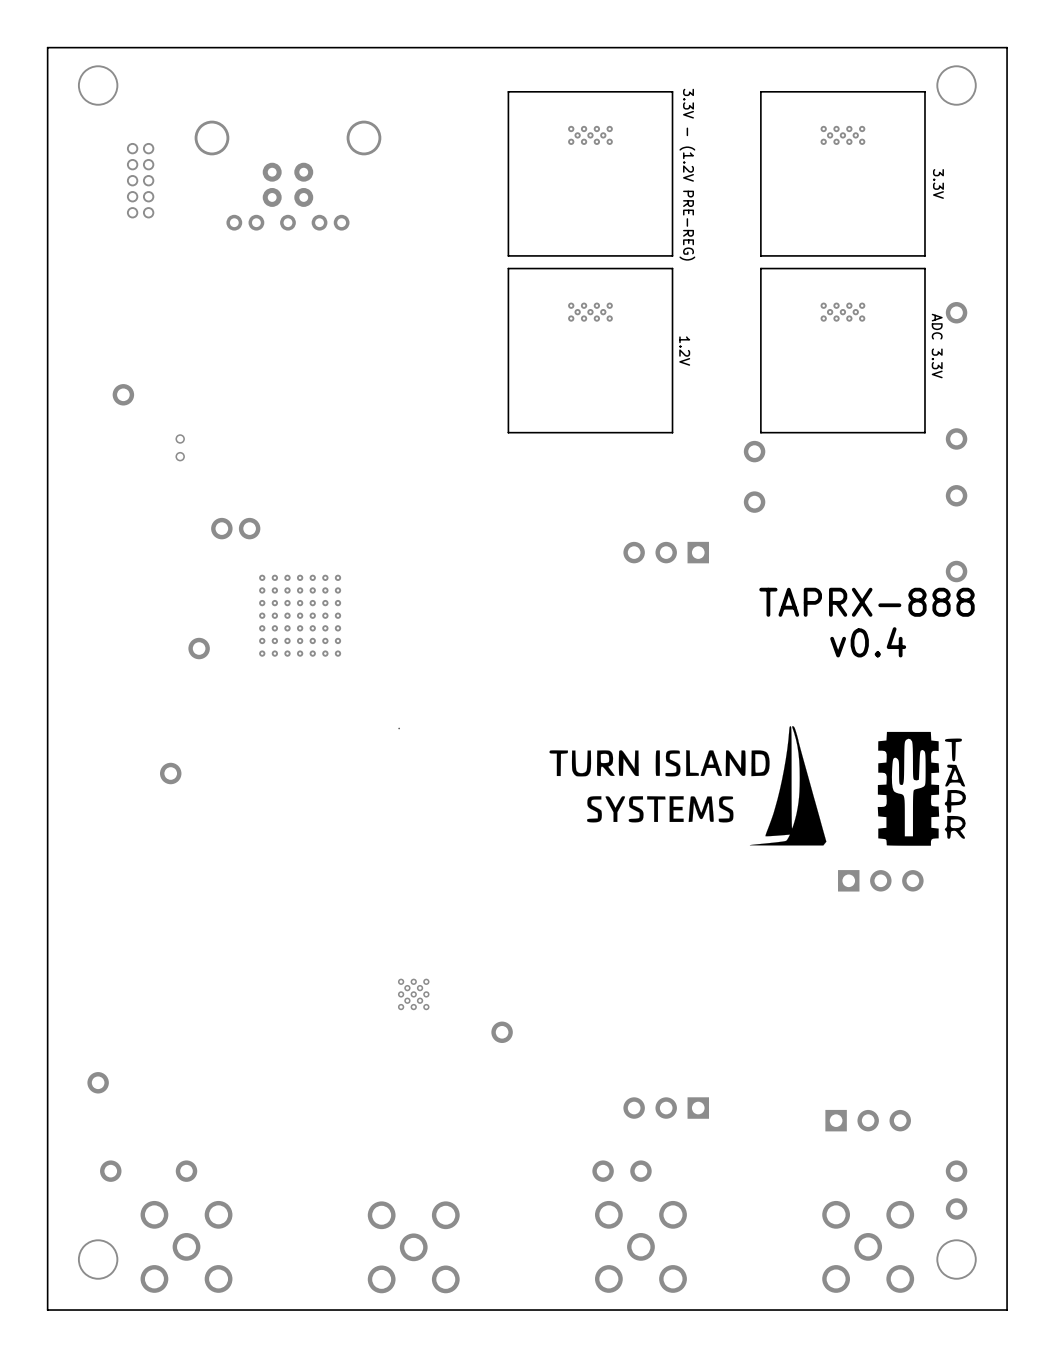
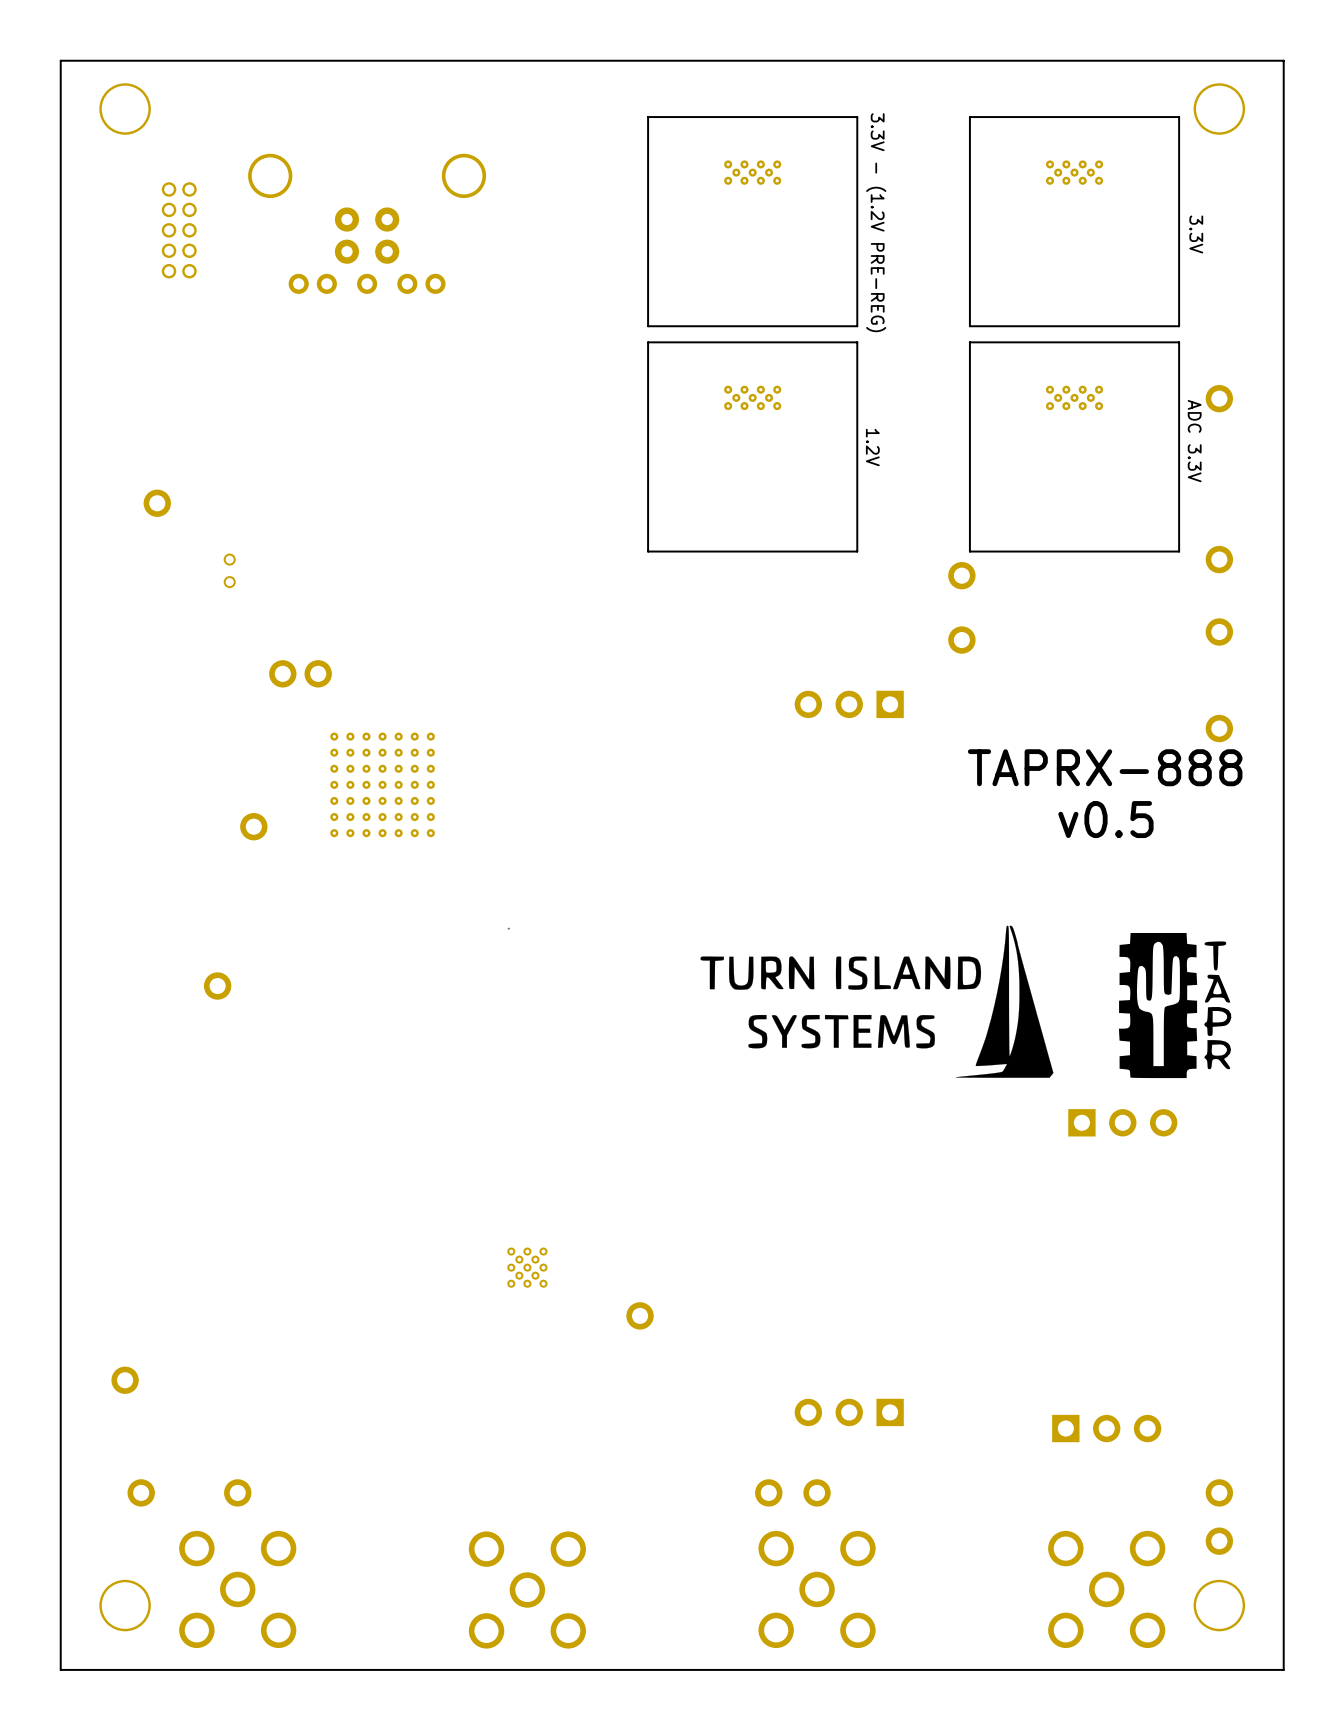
text: v0.4 (868, 642) -> v0.5 (1105, 819)

